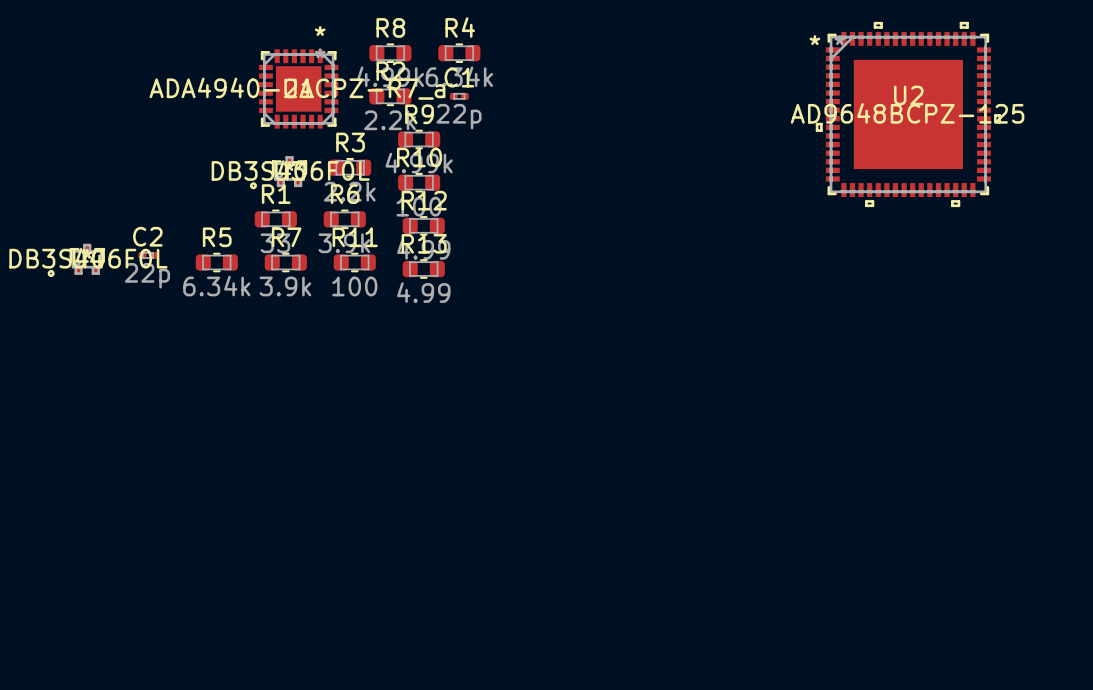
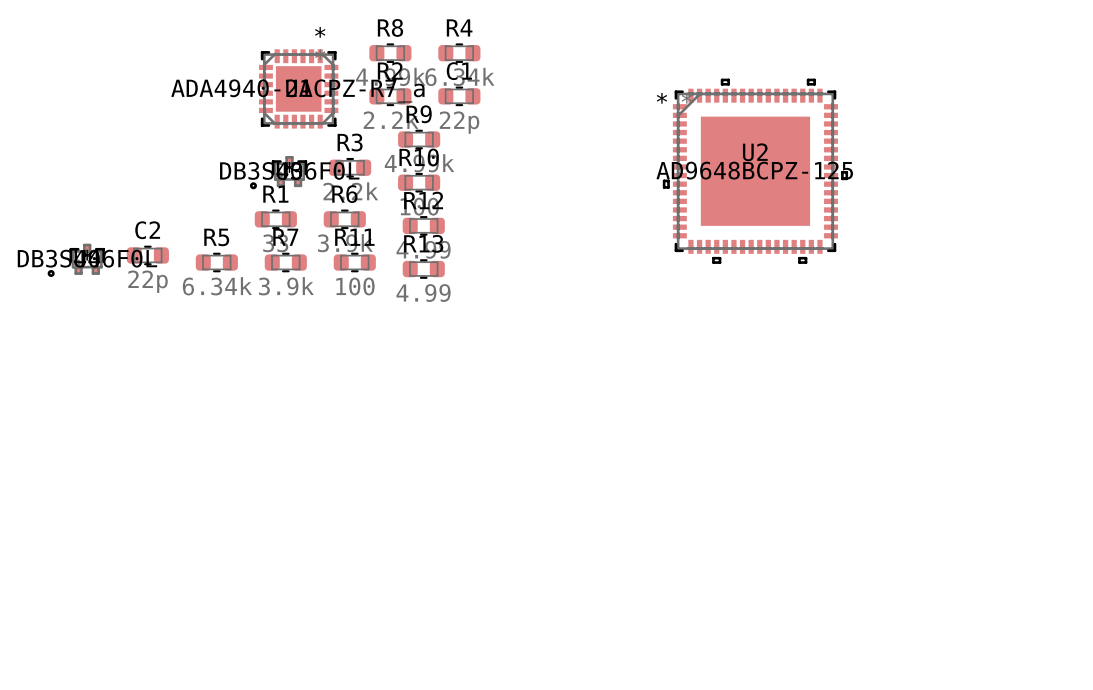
C1 footprint: [449, 92, 469, 100] -> [438, 86, 481, 107]
U2 position: (908, 114) -> (755, 171)
C2 footprint: [138, 252, 158, 259] -> [126, 245, 169, 266]

